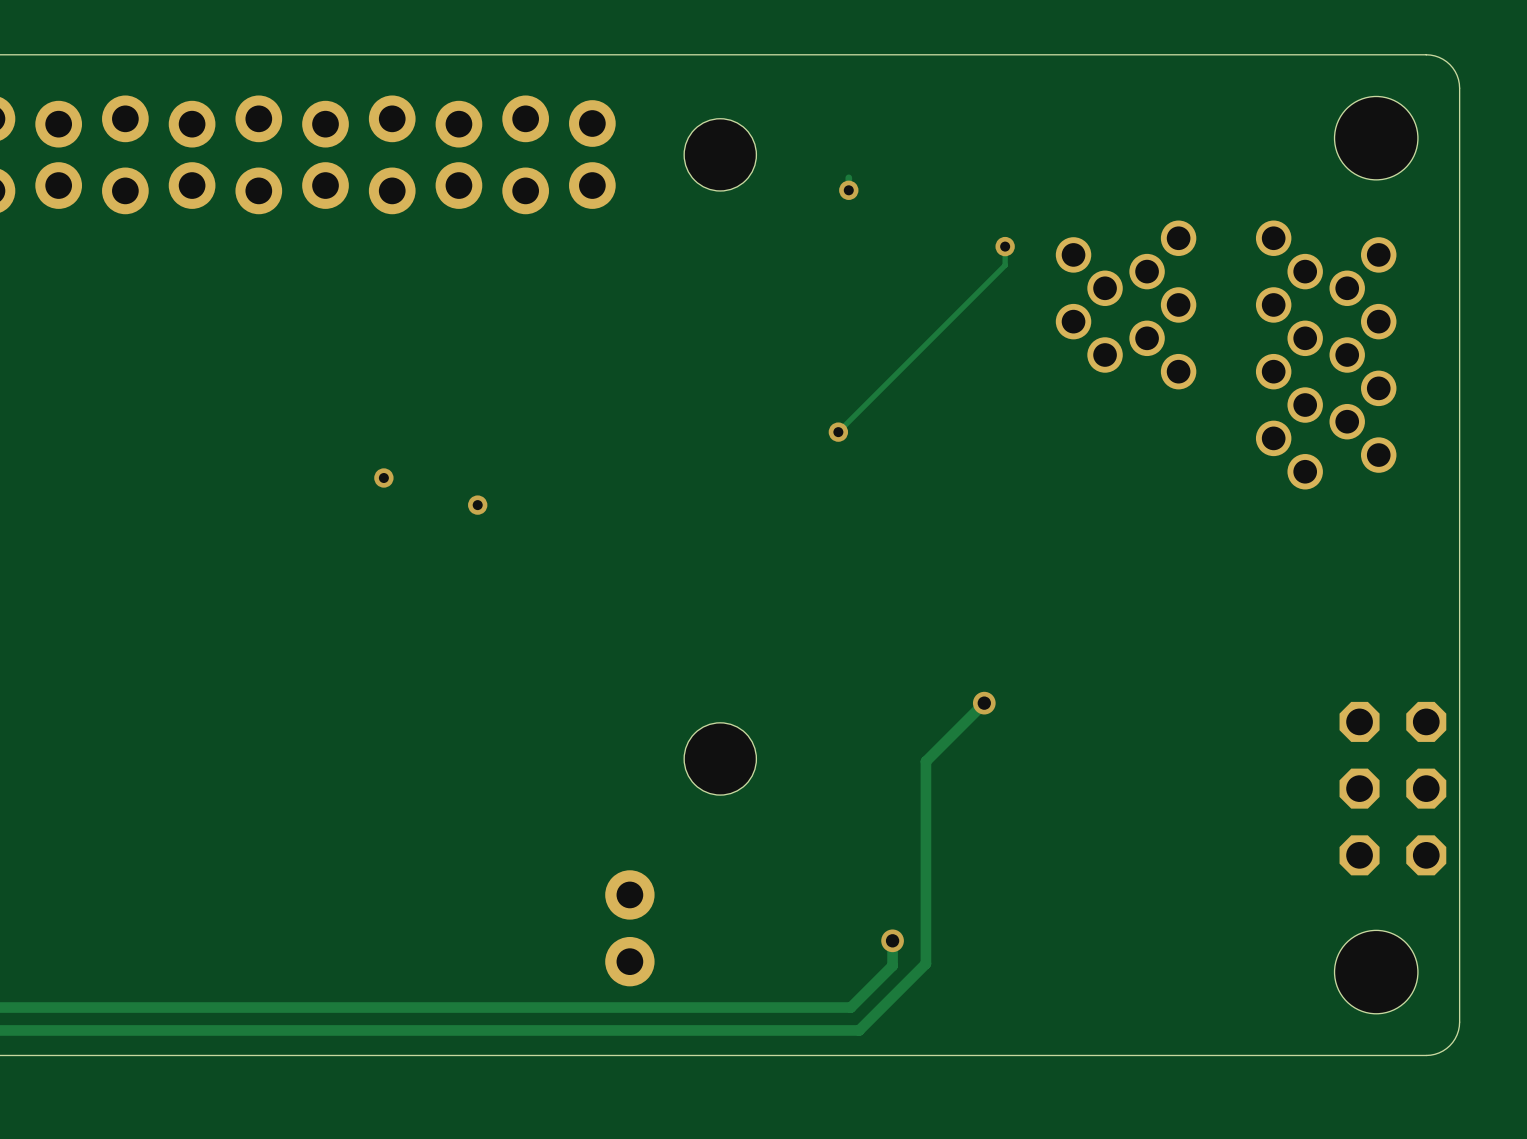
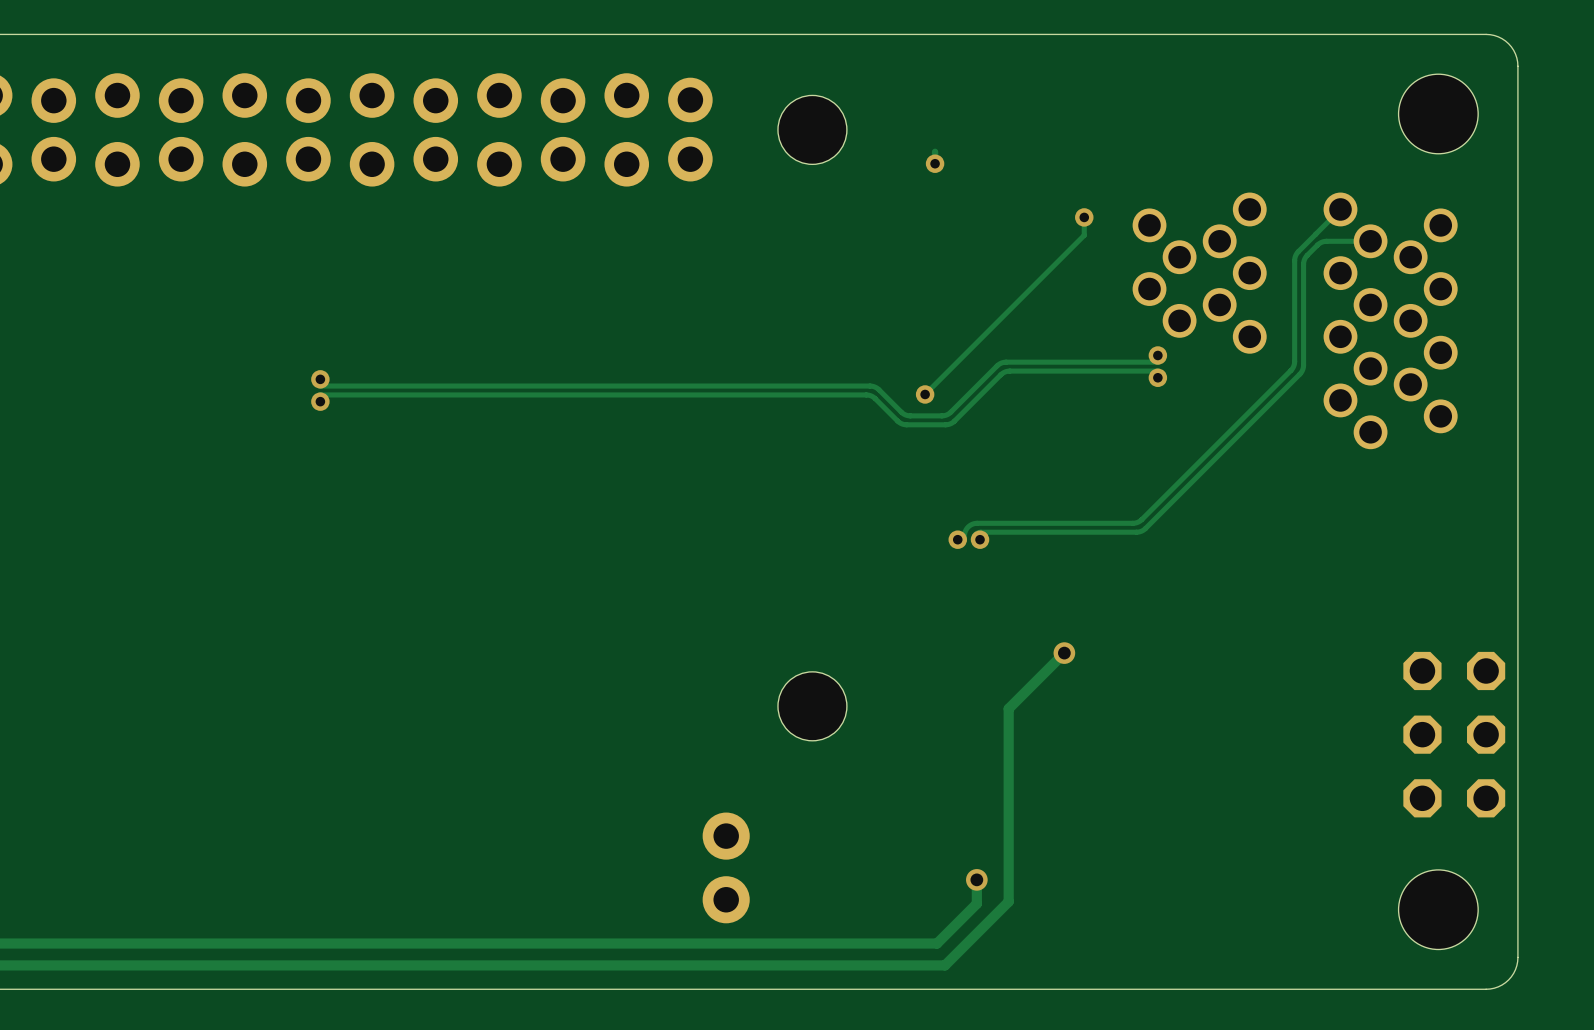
track: none -> (1340, 209) (1295, 256) (1294, 361) (1292, 368) (1140, 520) (1132, 523) (975, 523) (967, 528) (964, 539) (957, 539)
track: none -> (1370, 241) (1324, 241) (1318, 244) (1306, 256) (1303, 264) (1302, 371) (1144, 529) (1136, 532) (980, 532) (976, 533) (973, 538) (980, 539)
track: none -> (1157, 355) (1157, 362) (1002, 362) (949, 412) (941, 415) (905, 414) (878, 388) (871, 386) (320, 386) (320, 379)
via: none -> (1157, 355)
track: none -> (1157, 377) (1157, 371) (1007, 371) (1000, 374) (953, 421) (945, 424) (901, 423) (874, 397) (866, 394) (320, 394) (320, 401)
via: none -> (1157, 377)
via: none -> (320, 379)
via: none -> (320, 401)
via: (383, 477) -> none
via: (477, 505) -> none
via: none -> (957, 539)
via: none -> (980, 539)

